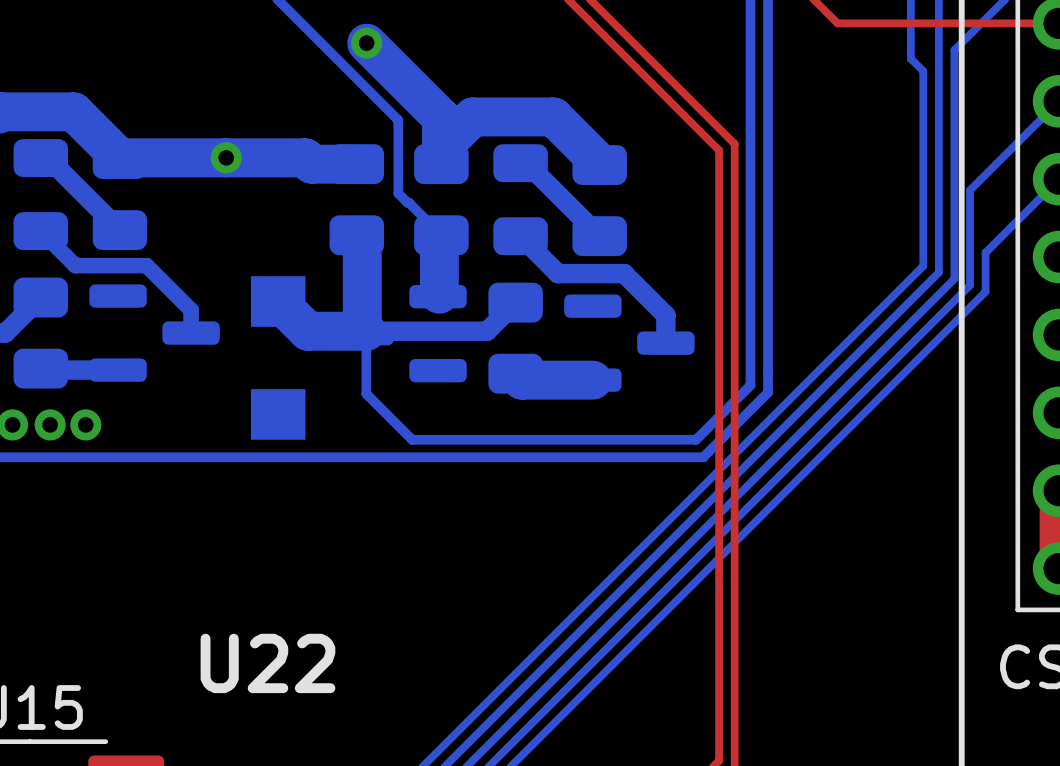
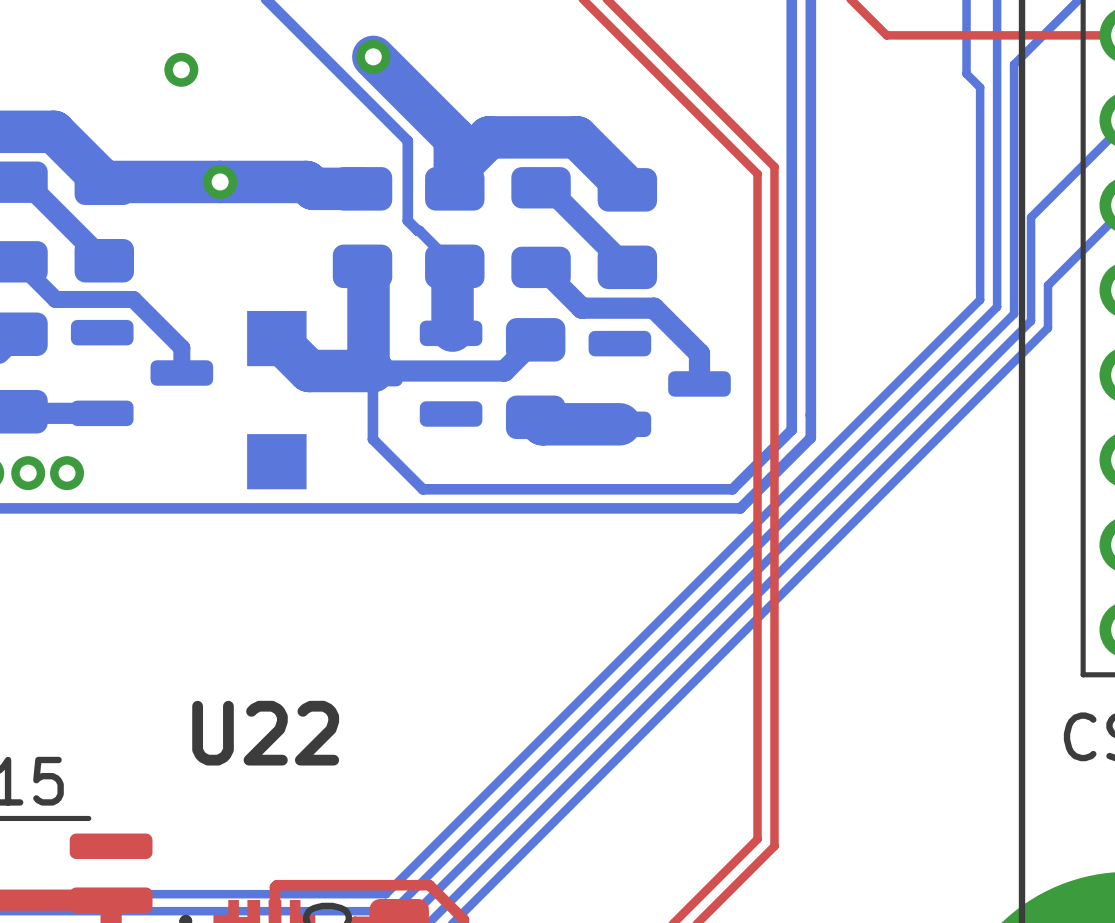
via: none -> (181, 69)

